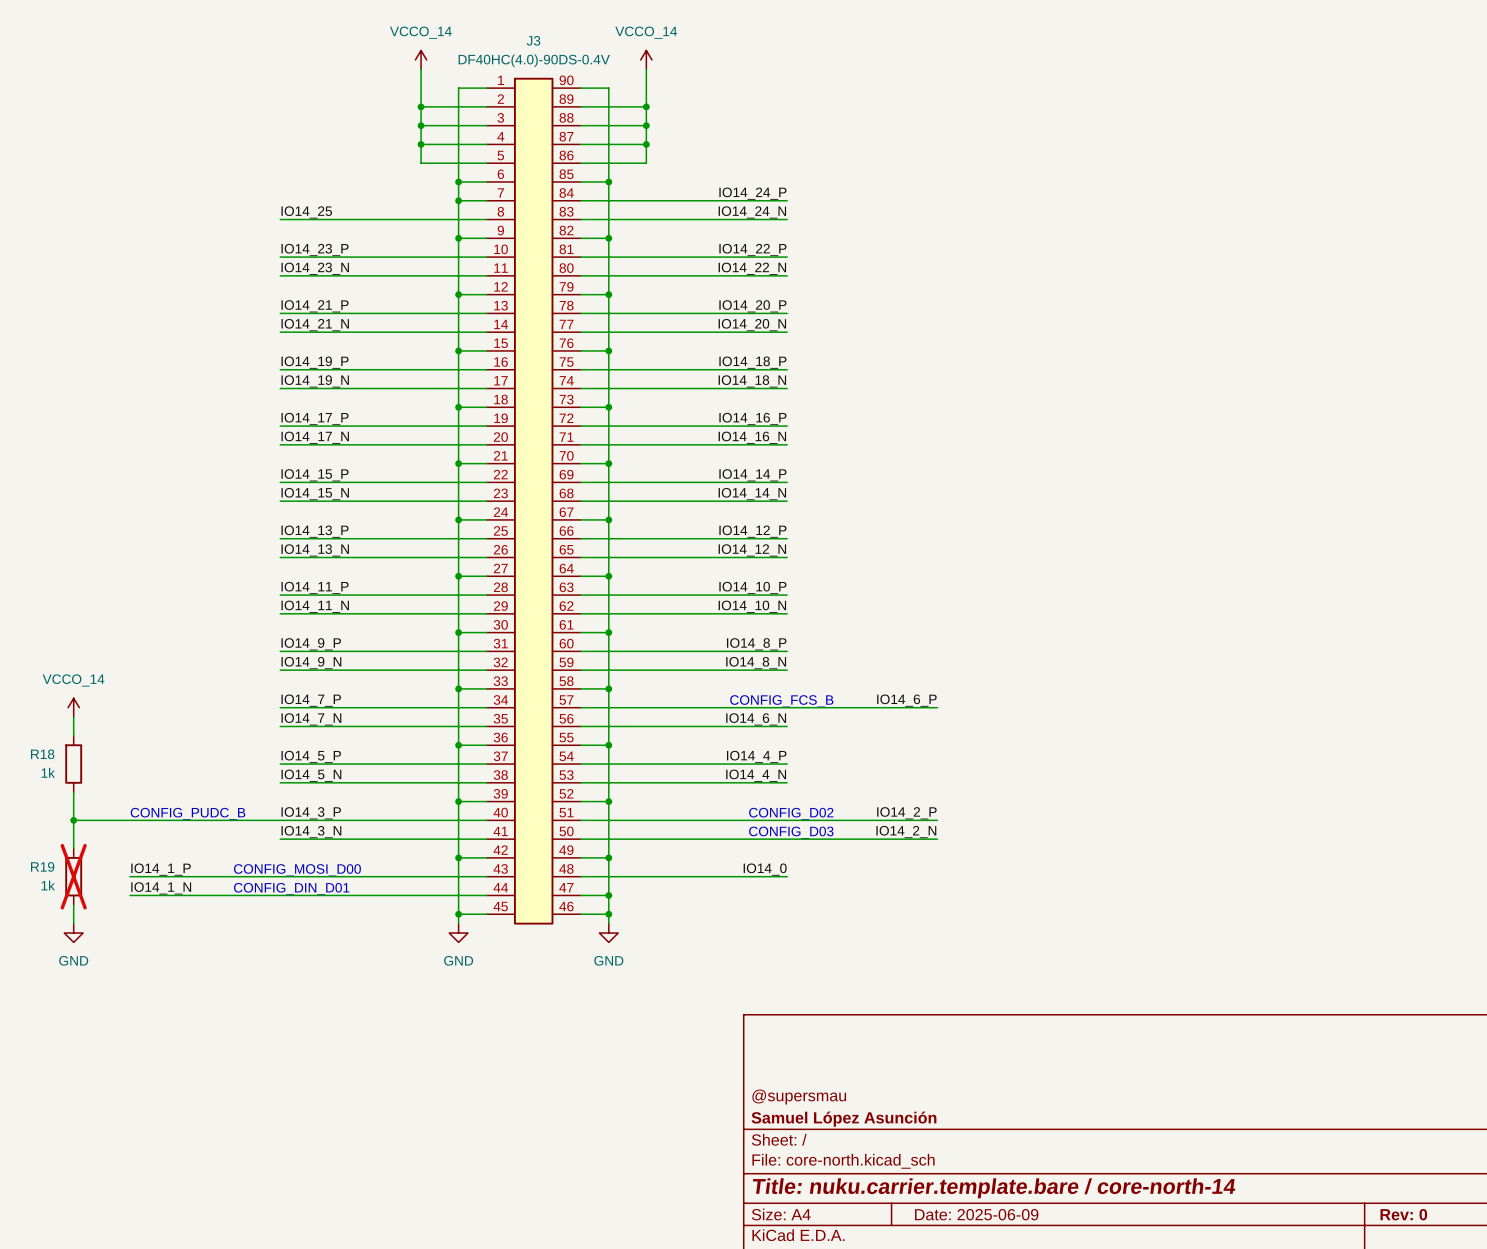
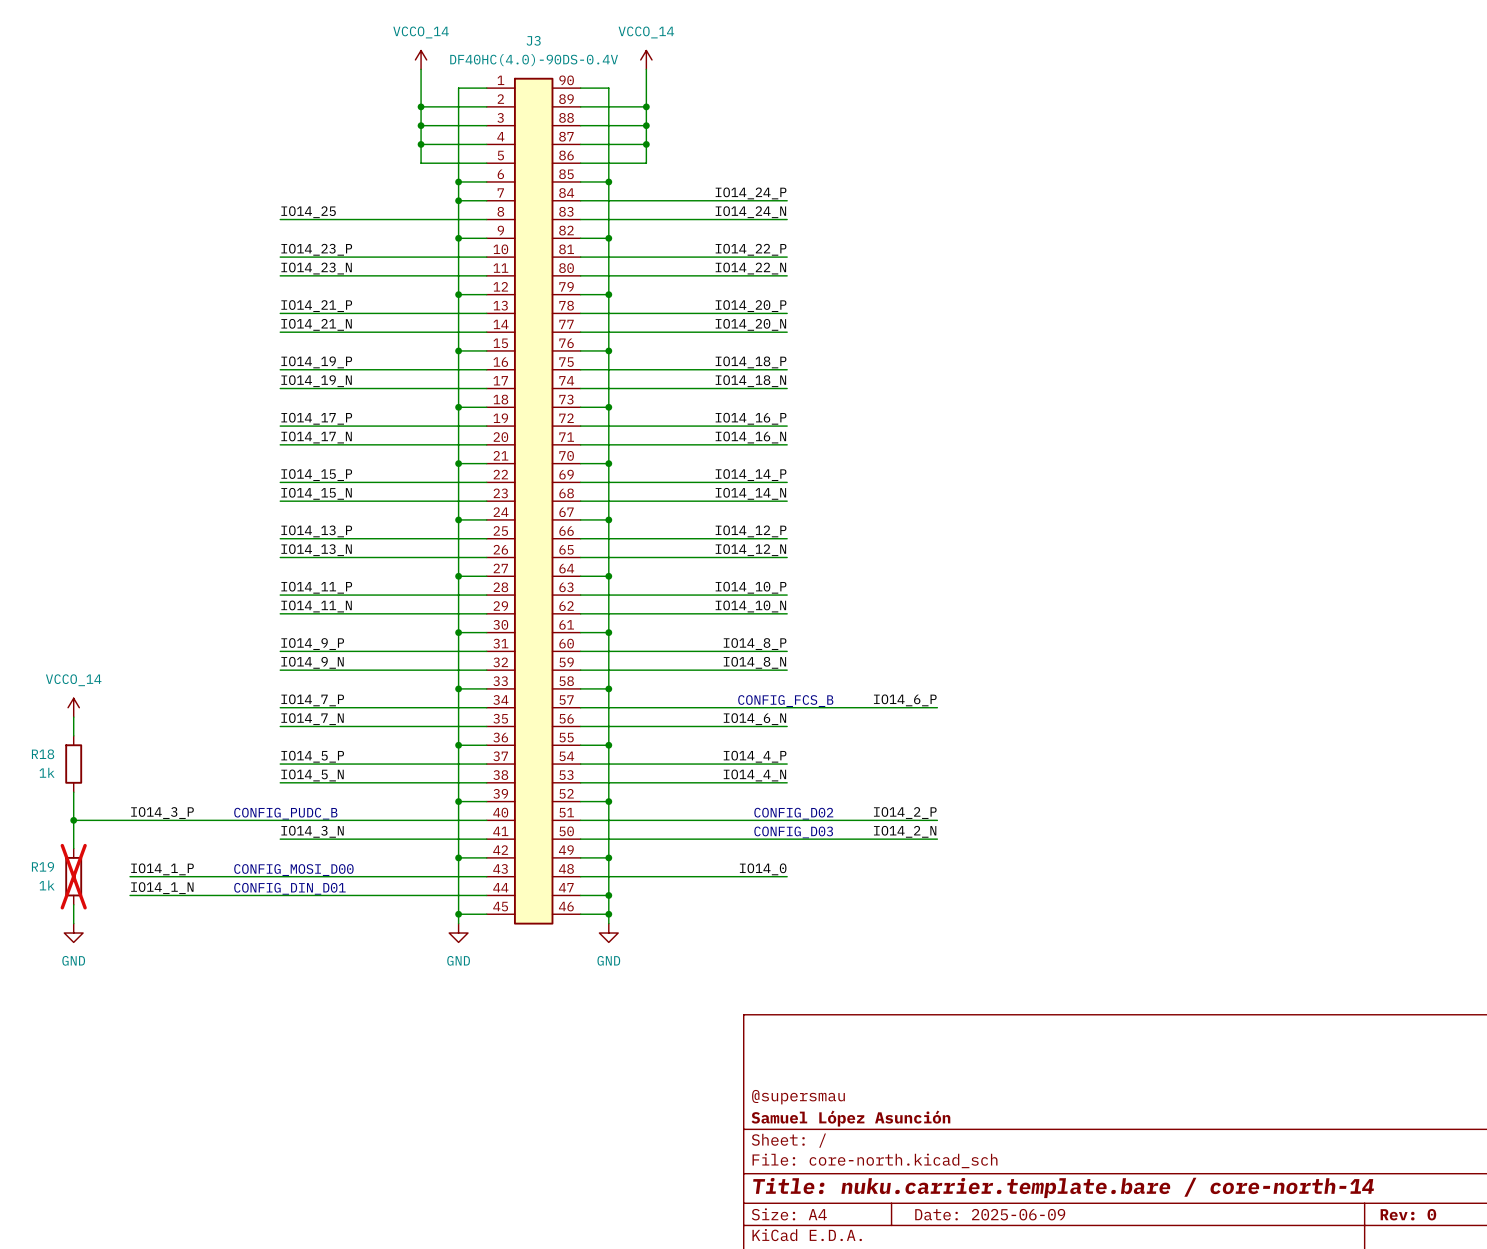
text position: CONFIG_PUDC_B (188, 813) -> CONFIG_PUDC_B (285, 813)
label position: IO14_3_P (311, 813) -> IO14_3_P (162, 813)

